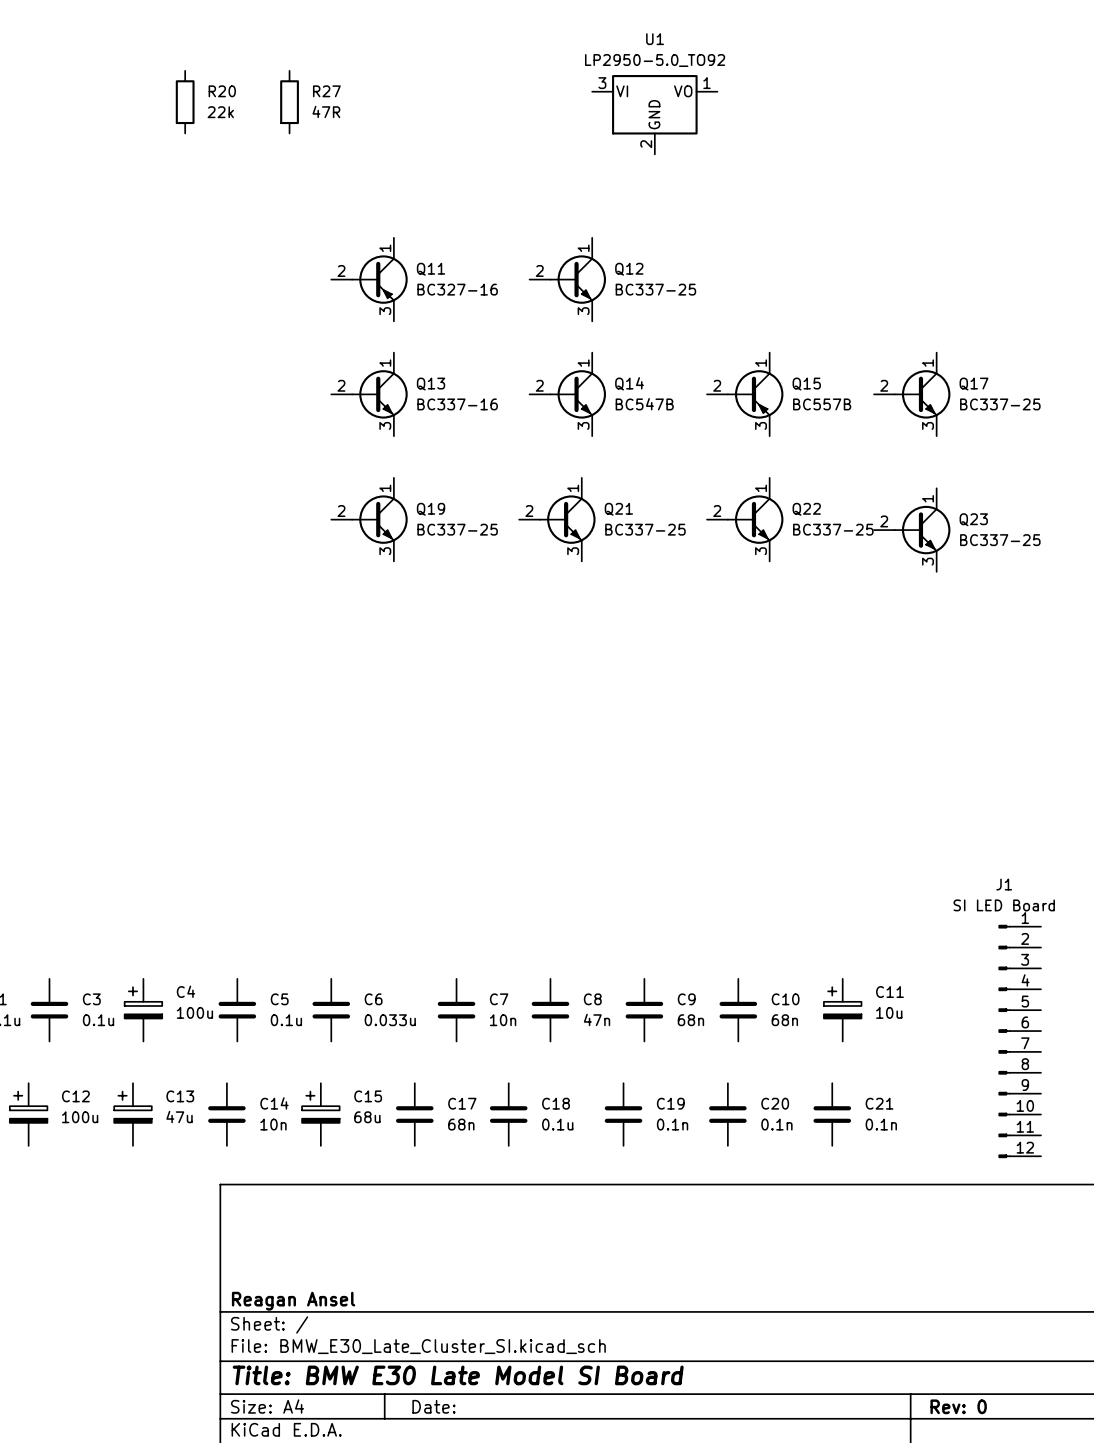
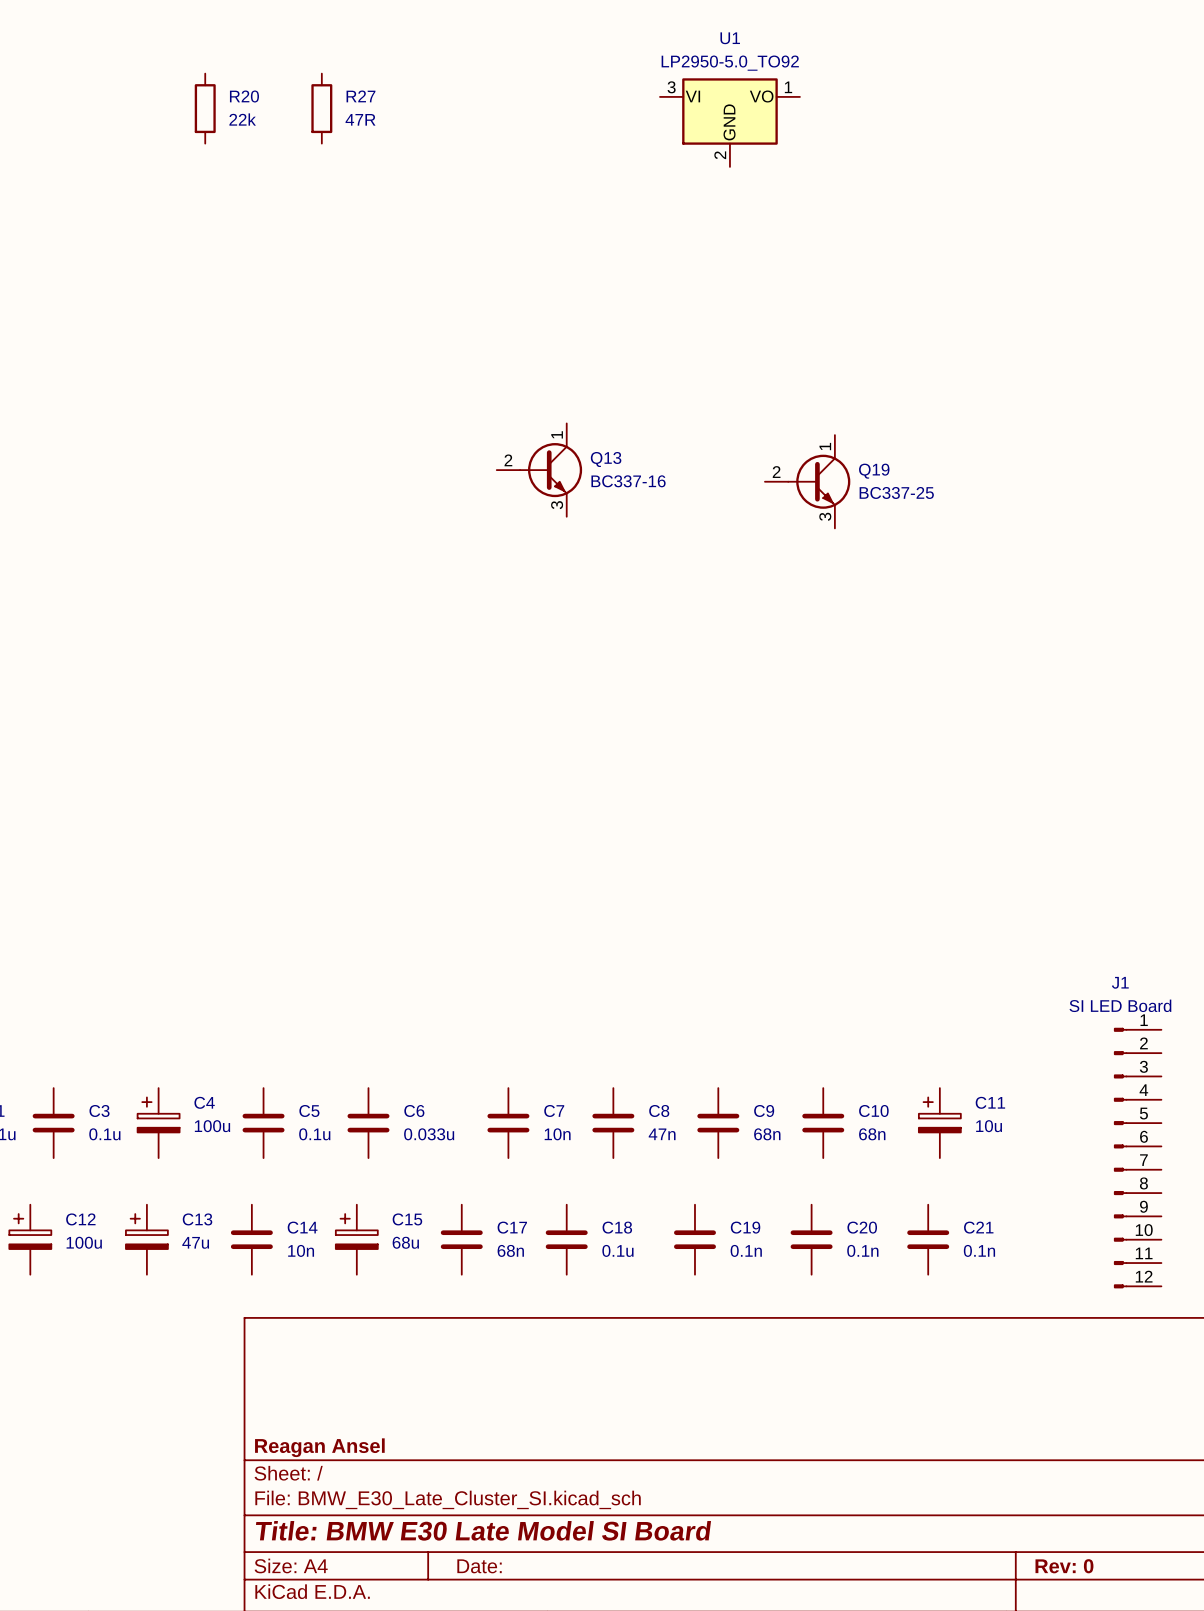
Q11: BC327-16 (369, 279) -> none
Q12: BC337-25 (567, 279) -> none
Q13 position: (369, 394) -> (539, 470)
Q14: BC547B (567, 394) -> none
Q15: BC557B (745, 394) -> none
Q17: BC337-25 (912, 394) -> none
Q19 position: (369, 519) -> (807, 481)
Q21: BC337-25 (557, 519) -> none
Q22: BC337-25 (745, 519) -> none
Q23: BC337-25 (912, 530) -> none

